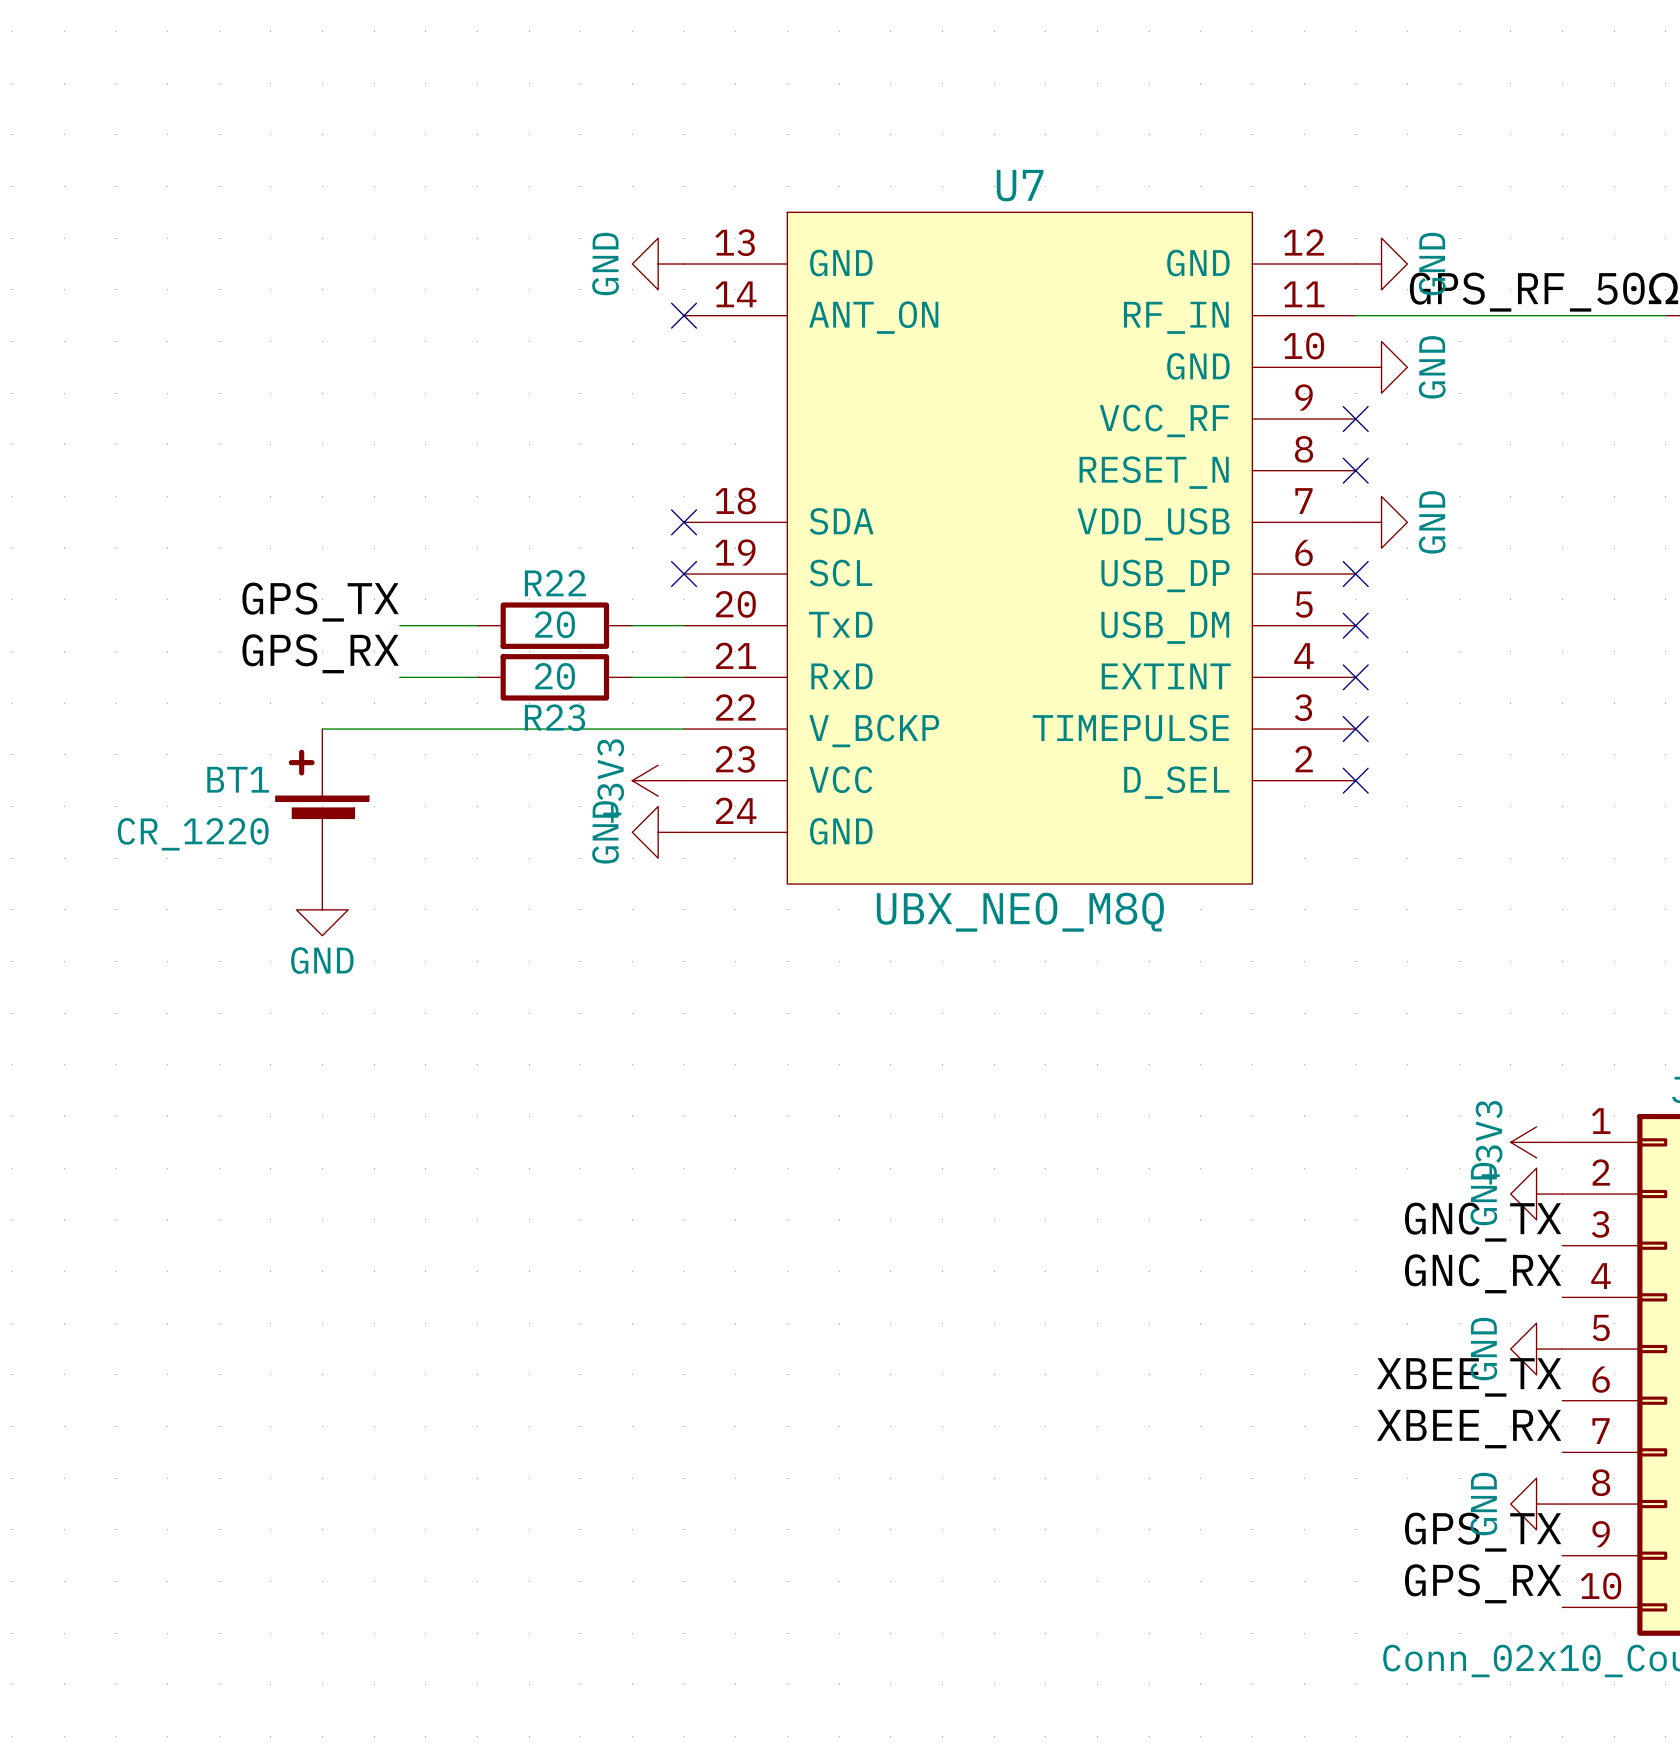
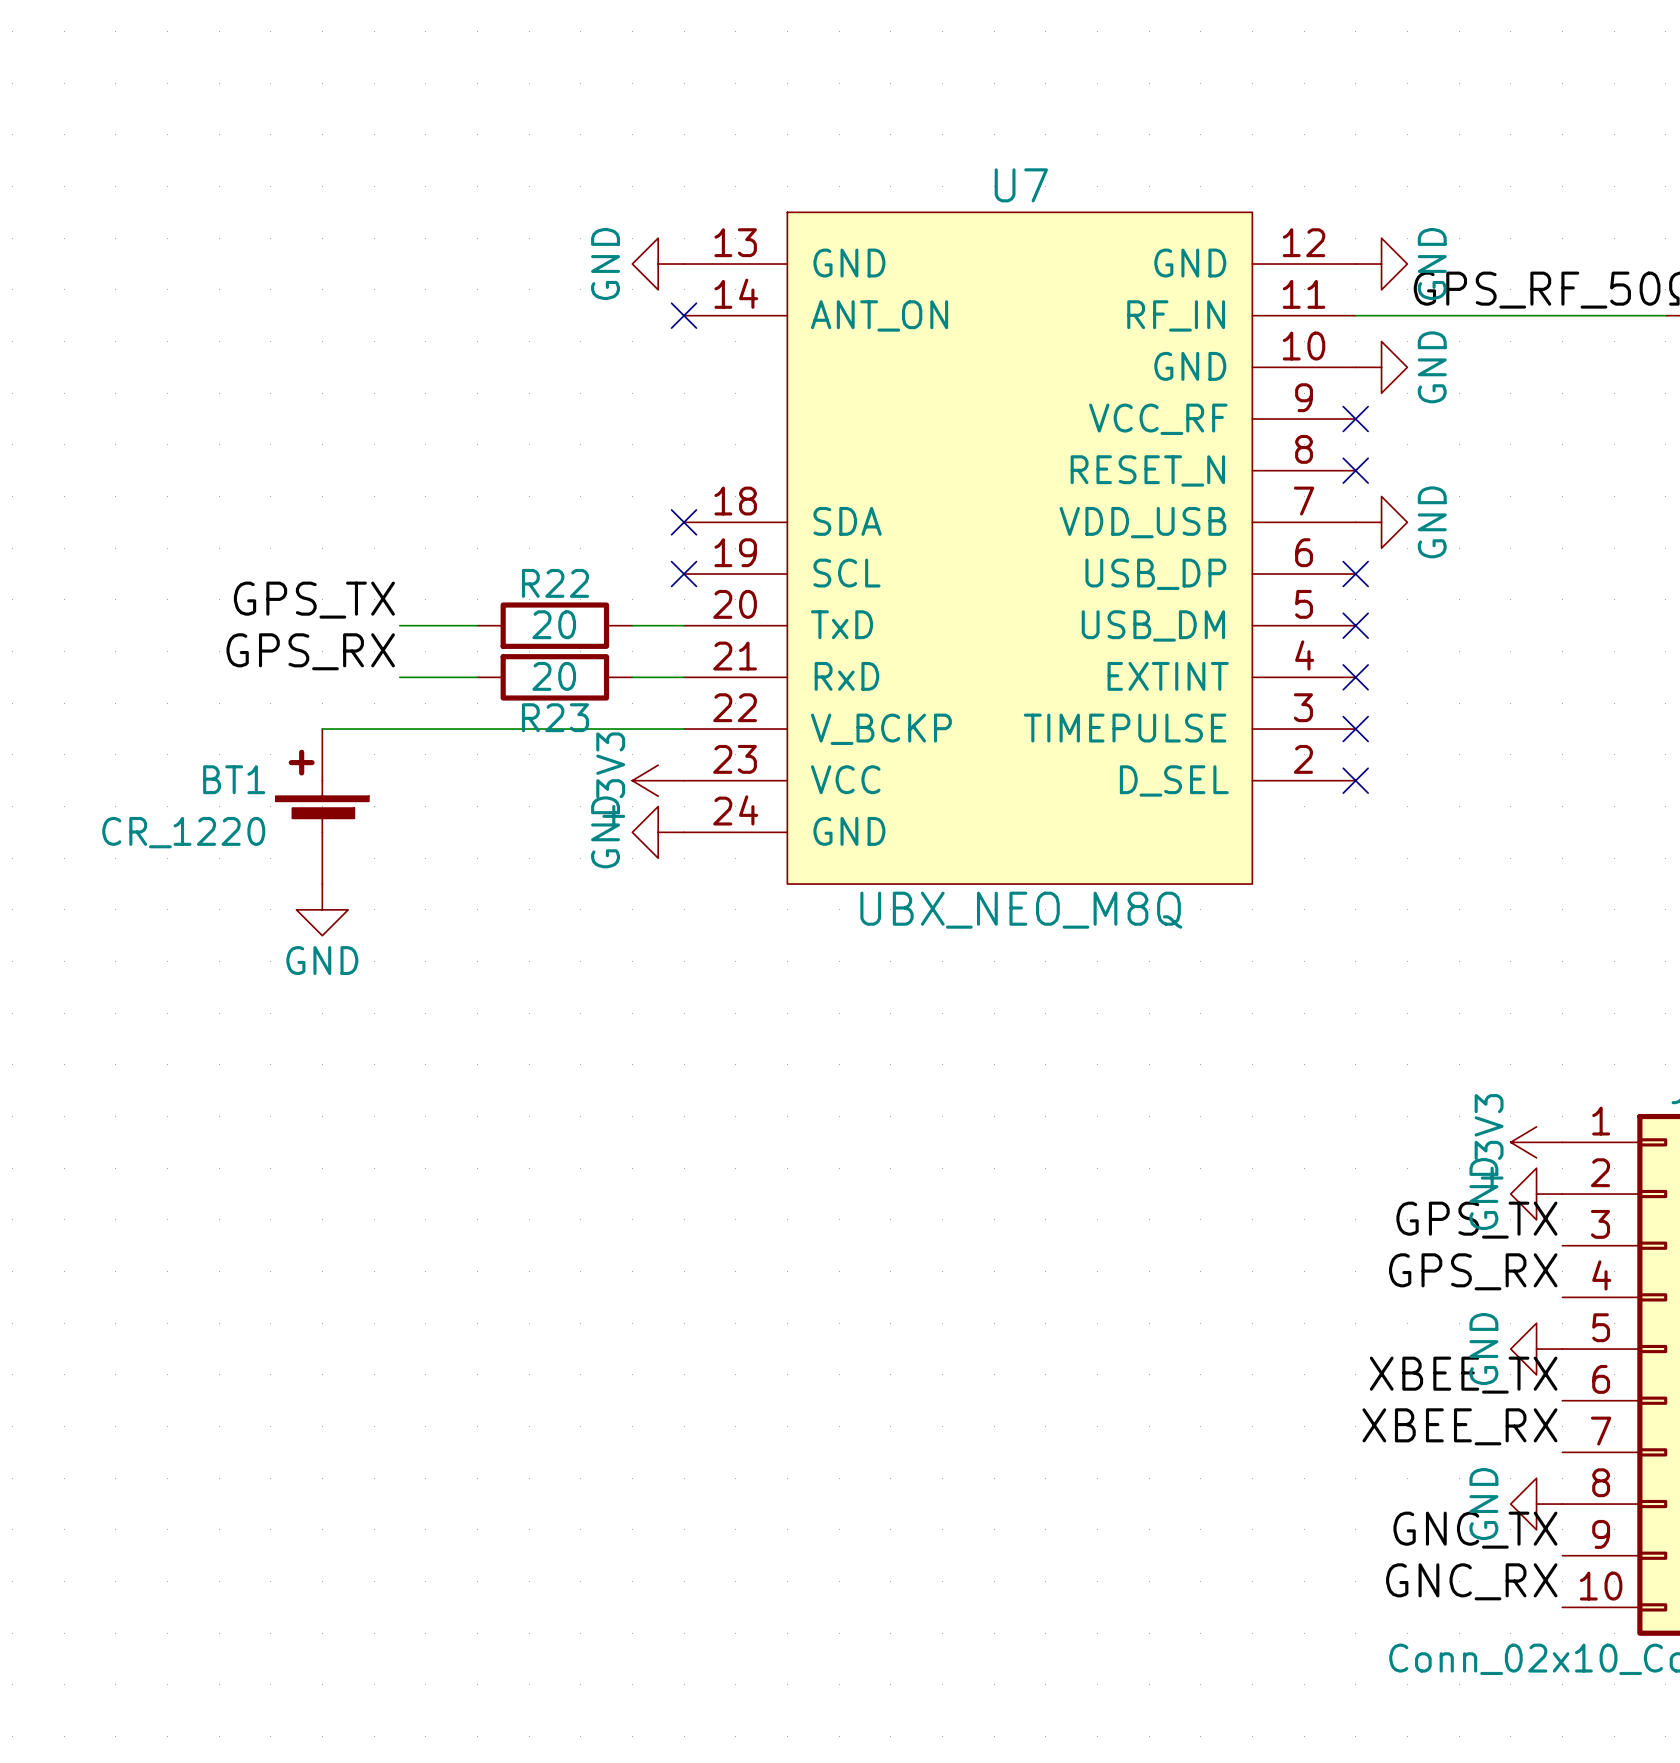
label: GNC_TX (1483, 1222) -> GPS_TX (1476, 1220)
label: GNC_RX (1483, 1273) -> GPS_RX (1473, 1271)
label: GPS_TX (1483, 1532) -> GNC_TX (1475, 1530)
label: GPS_RX (1483, 1583) -> GNC_RX (1471, 1581)

